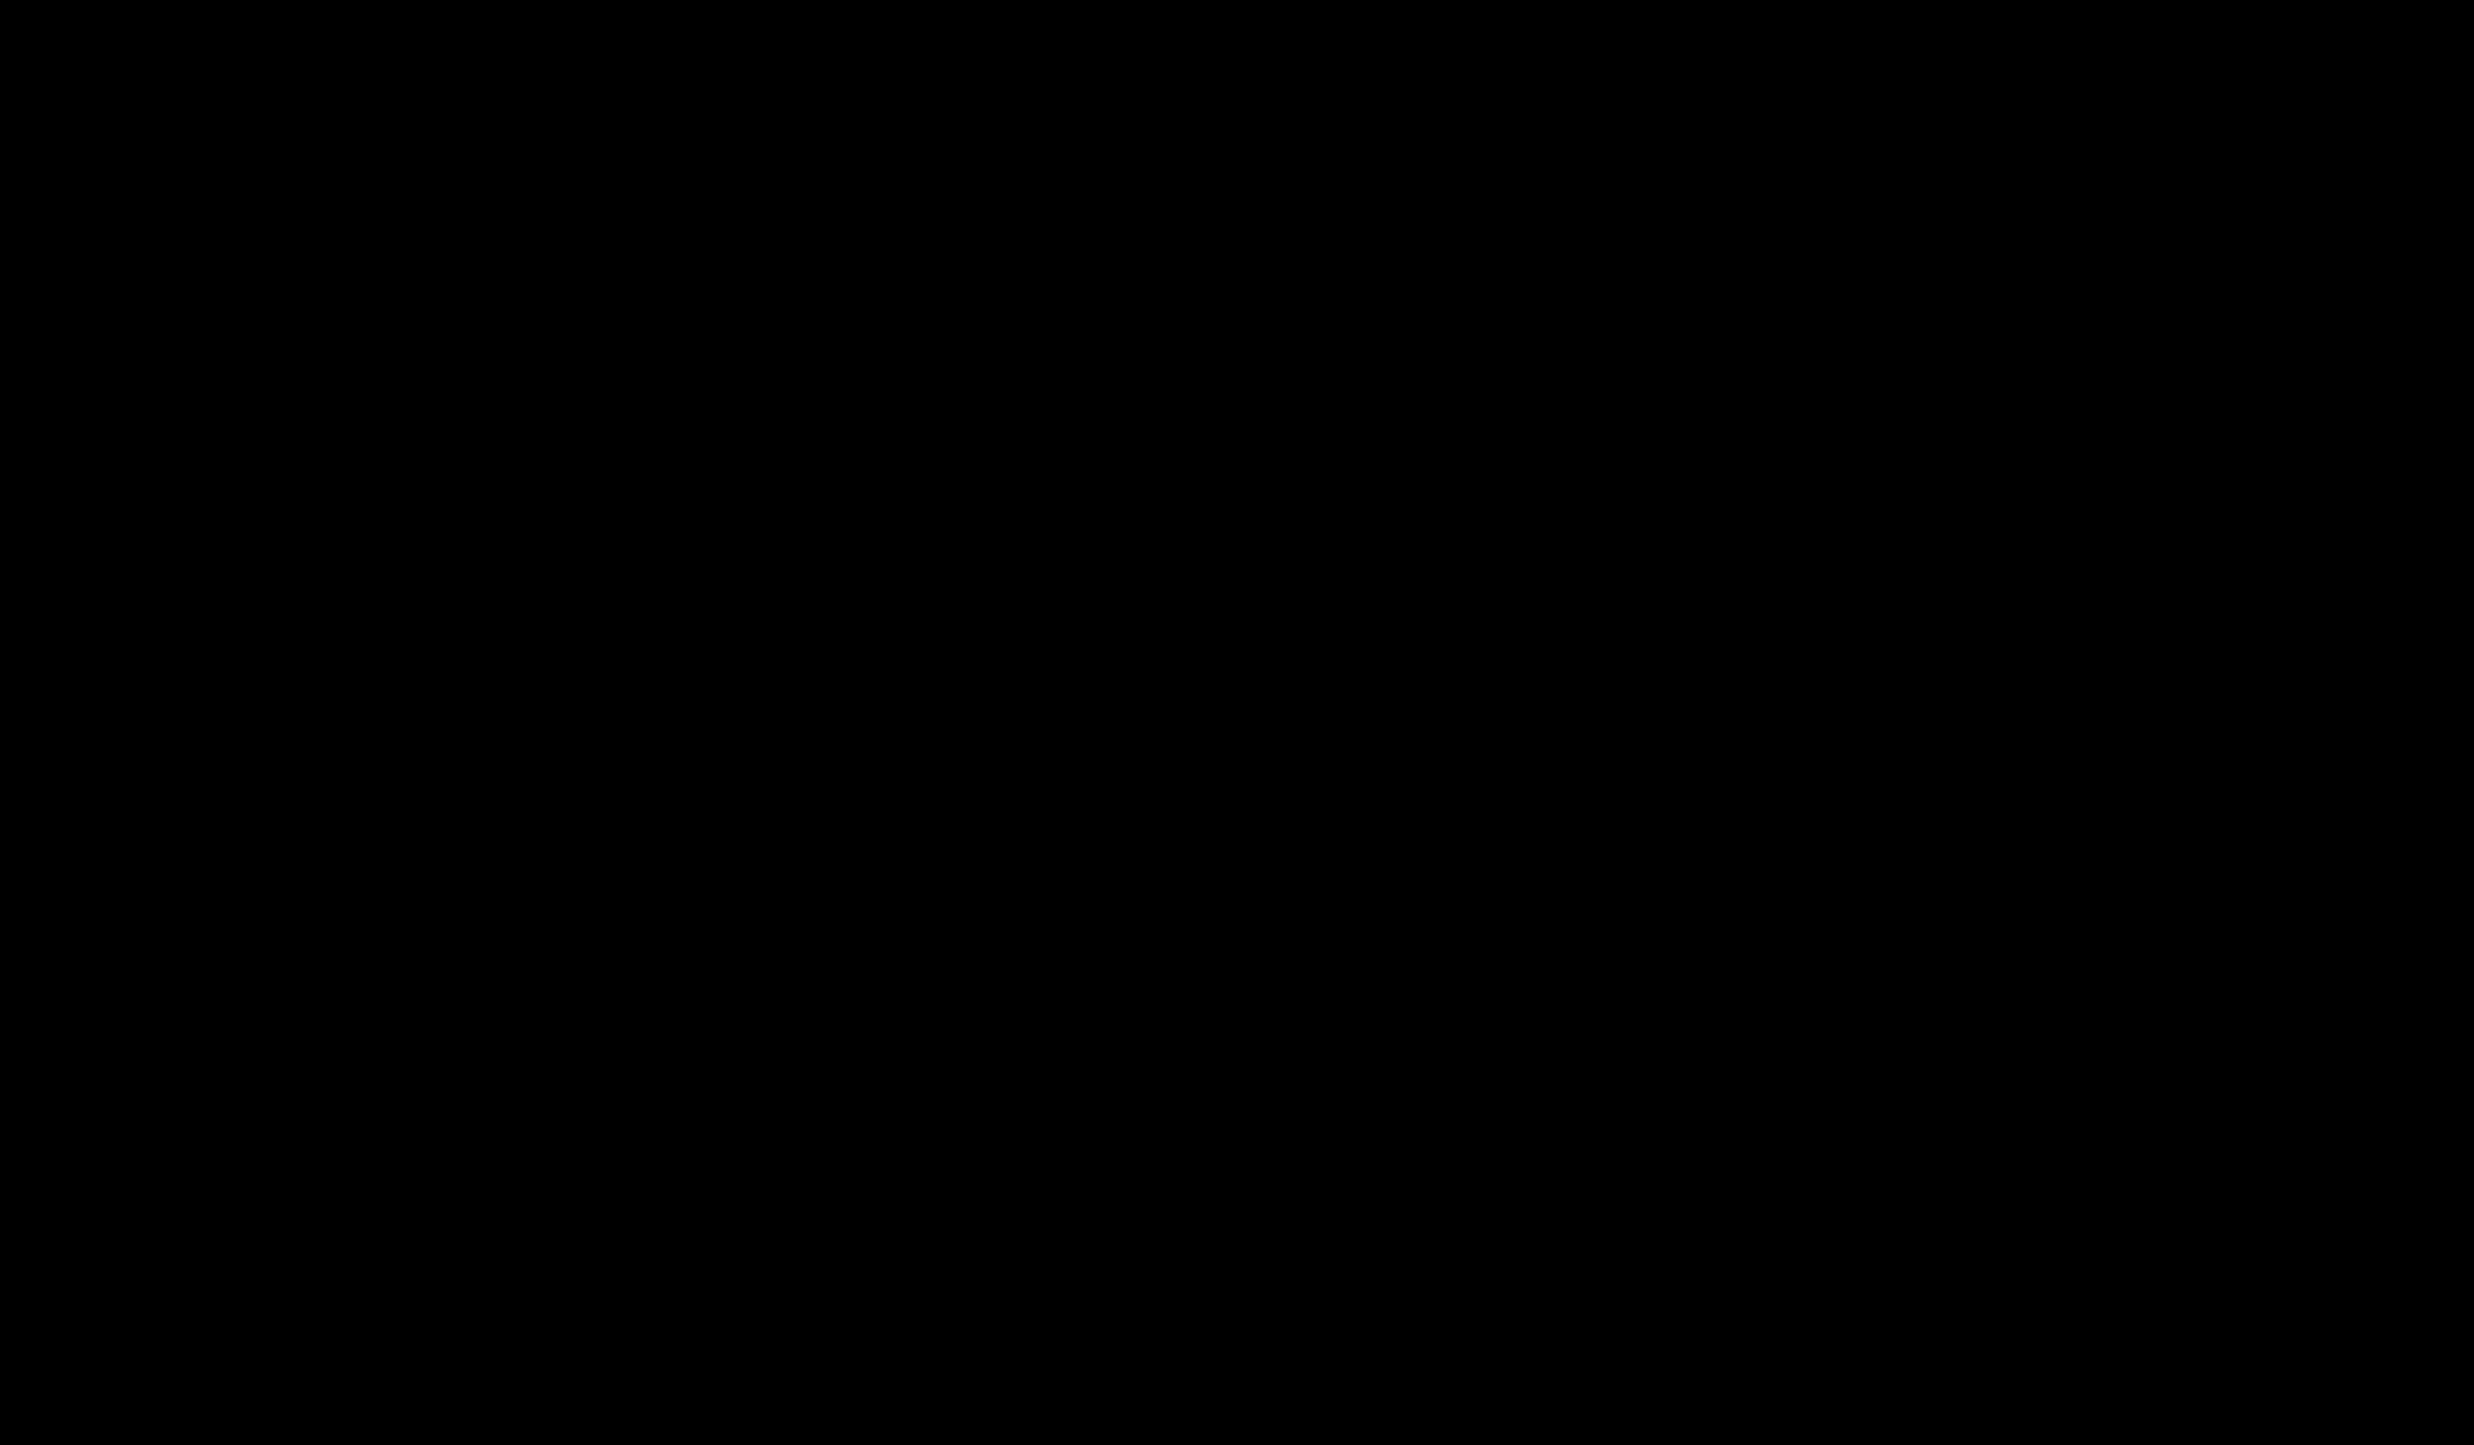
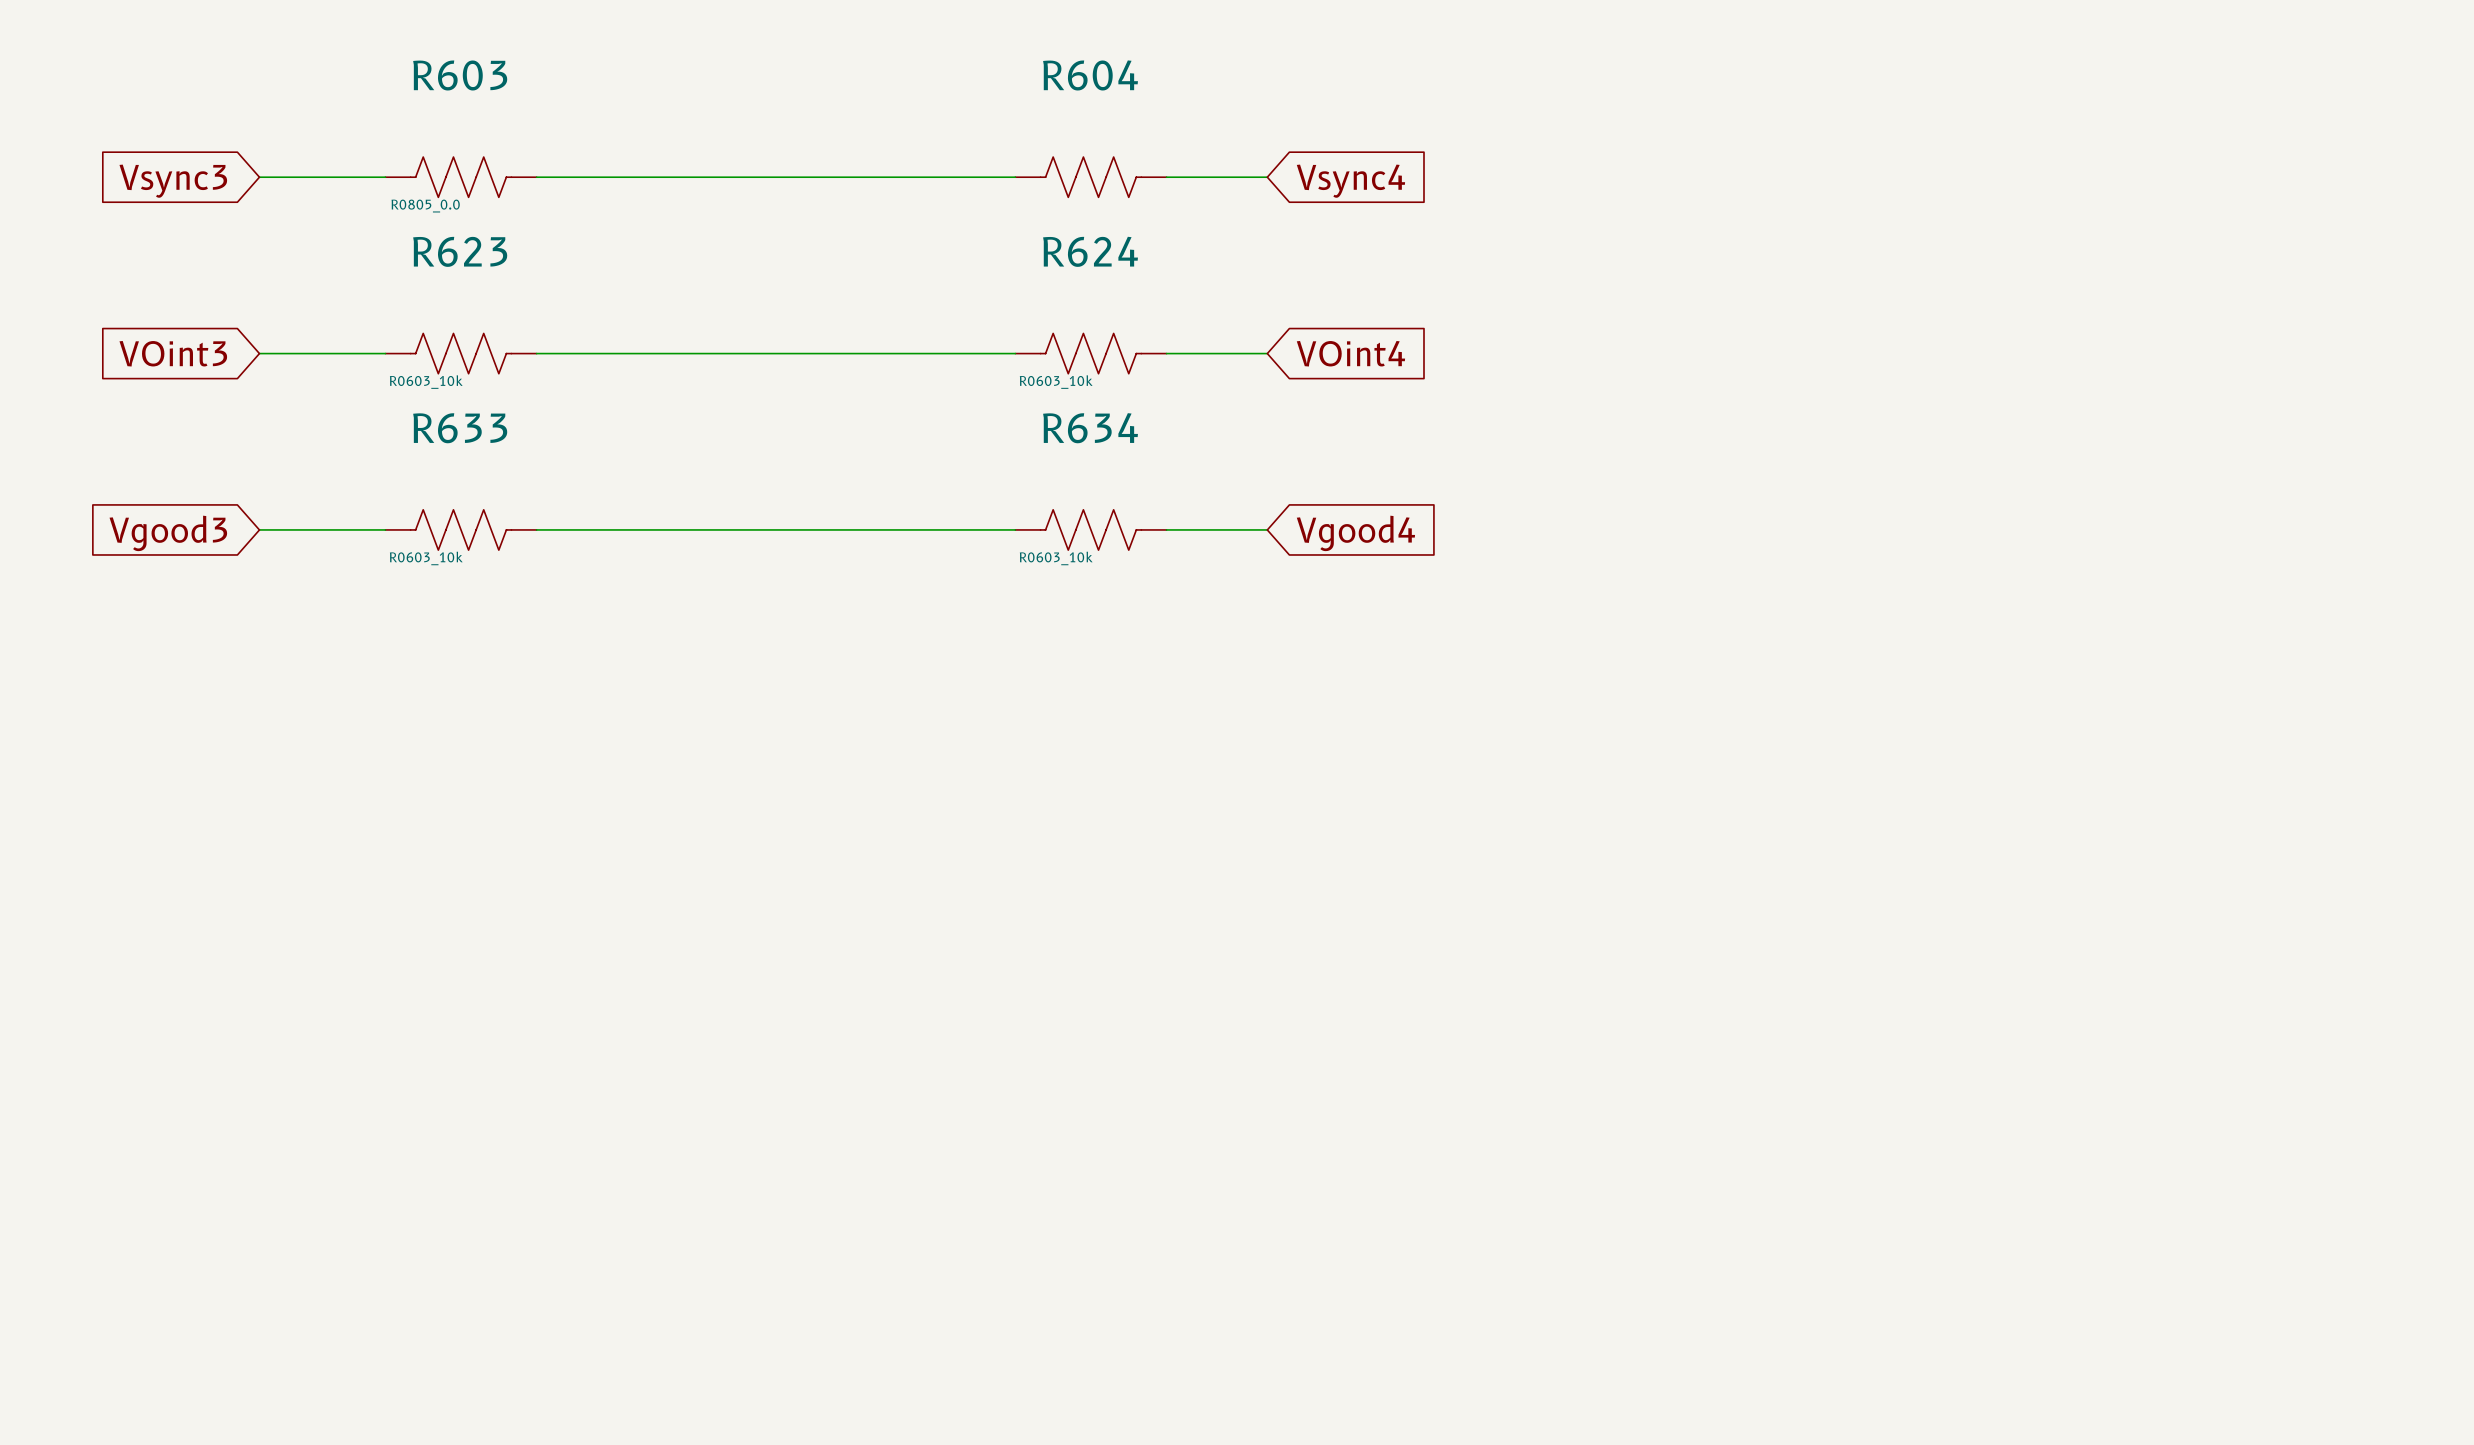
wire: none -> (259, 177) (385, 177)
R603: none -> R0805_0.0 (461, 177)
wire: none -> (536, 177) (1015, 177)
R604: none -> (1090, 177)
wire: none -> (1166, 177) (1267, 177)
global label: none -> Vsync4 (1350, 181)
global label: none -> Vsync3 (173, 181)
global label: none -> VOint4 (1350, 353)
global label: none -> VOint3 (173, 353)
wire: none -> (259, 353) (385, 353)
R623: none -> R0603_10k (461, 353)
wire: none -> (536, 353) (1015, 353)
R624: none -> R0603_10k (1090, 353)
wire: none -> (1166, 353) (1267, 353)
wire: none -> (259, 529) (385, 529)
R633: none -> R0603_10k (461, 529)
wire: none -> (536, 529) (1015, 529)
R634: none -> R0603_10k (1090, 529)
wire: none -> (1166, 529) (1267, 529)
global label: none -> Vgood4 (1355, 533)
global label: none -> Vgood3 (168, 533)

